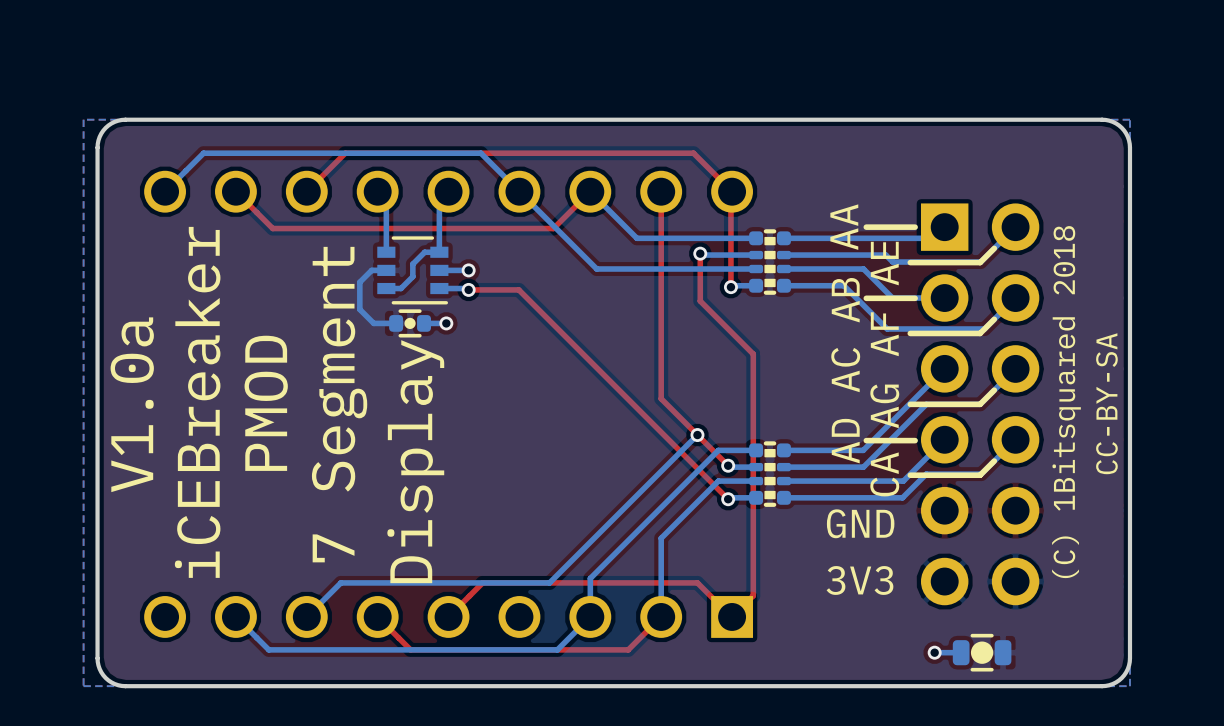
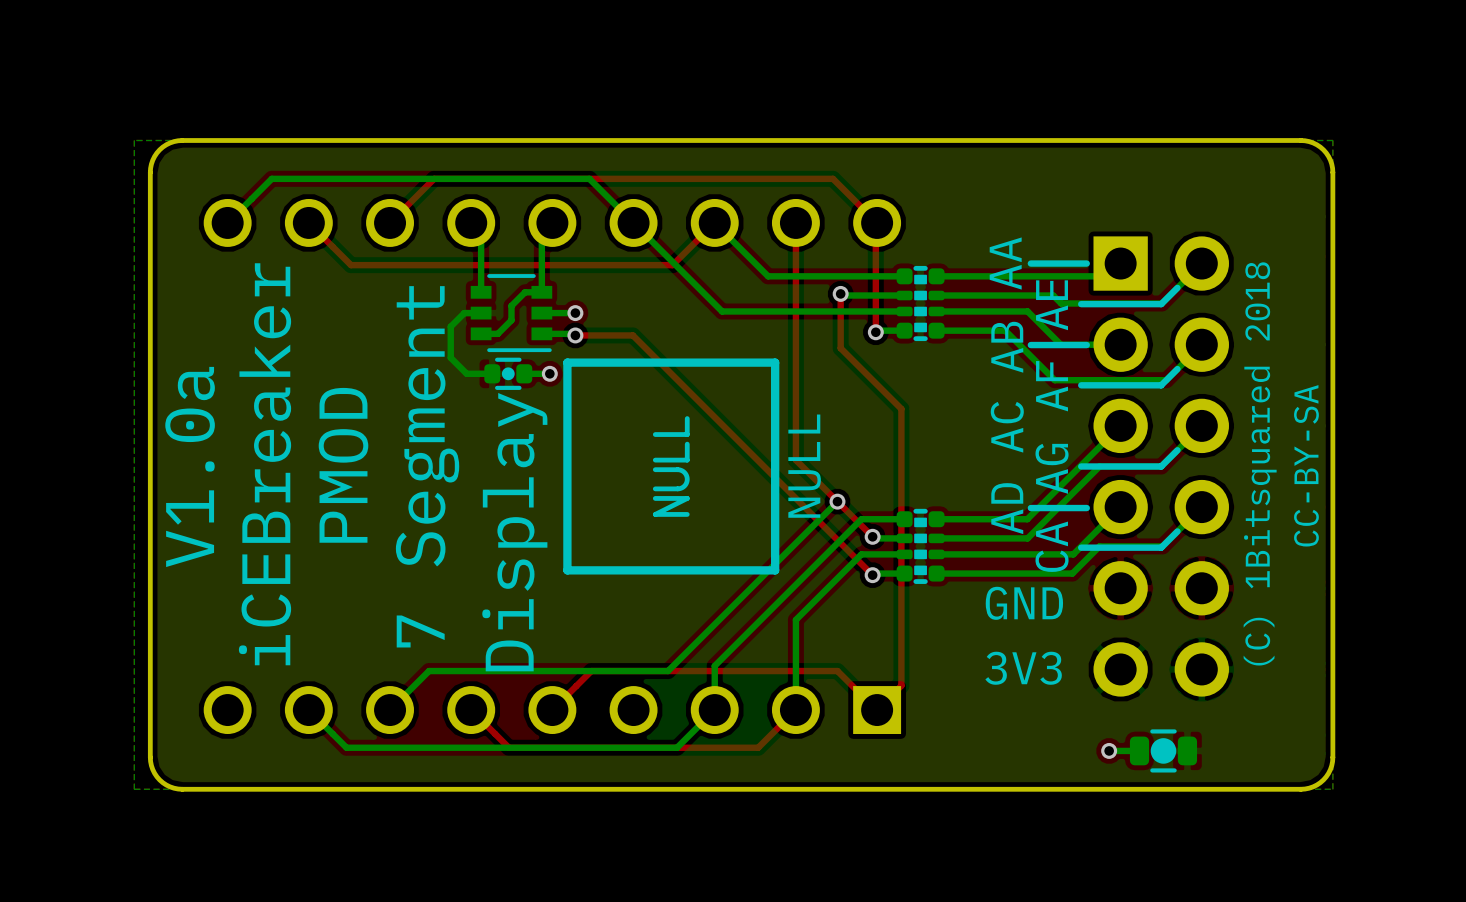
drawing: none -> [563, 358, 780, 575]
text: none -> NULL (804, 466)

